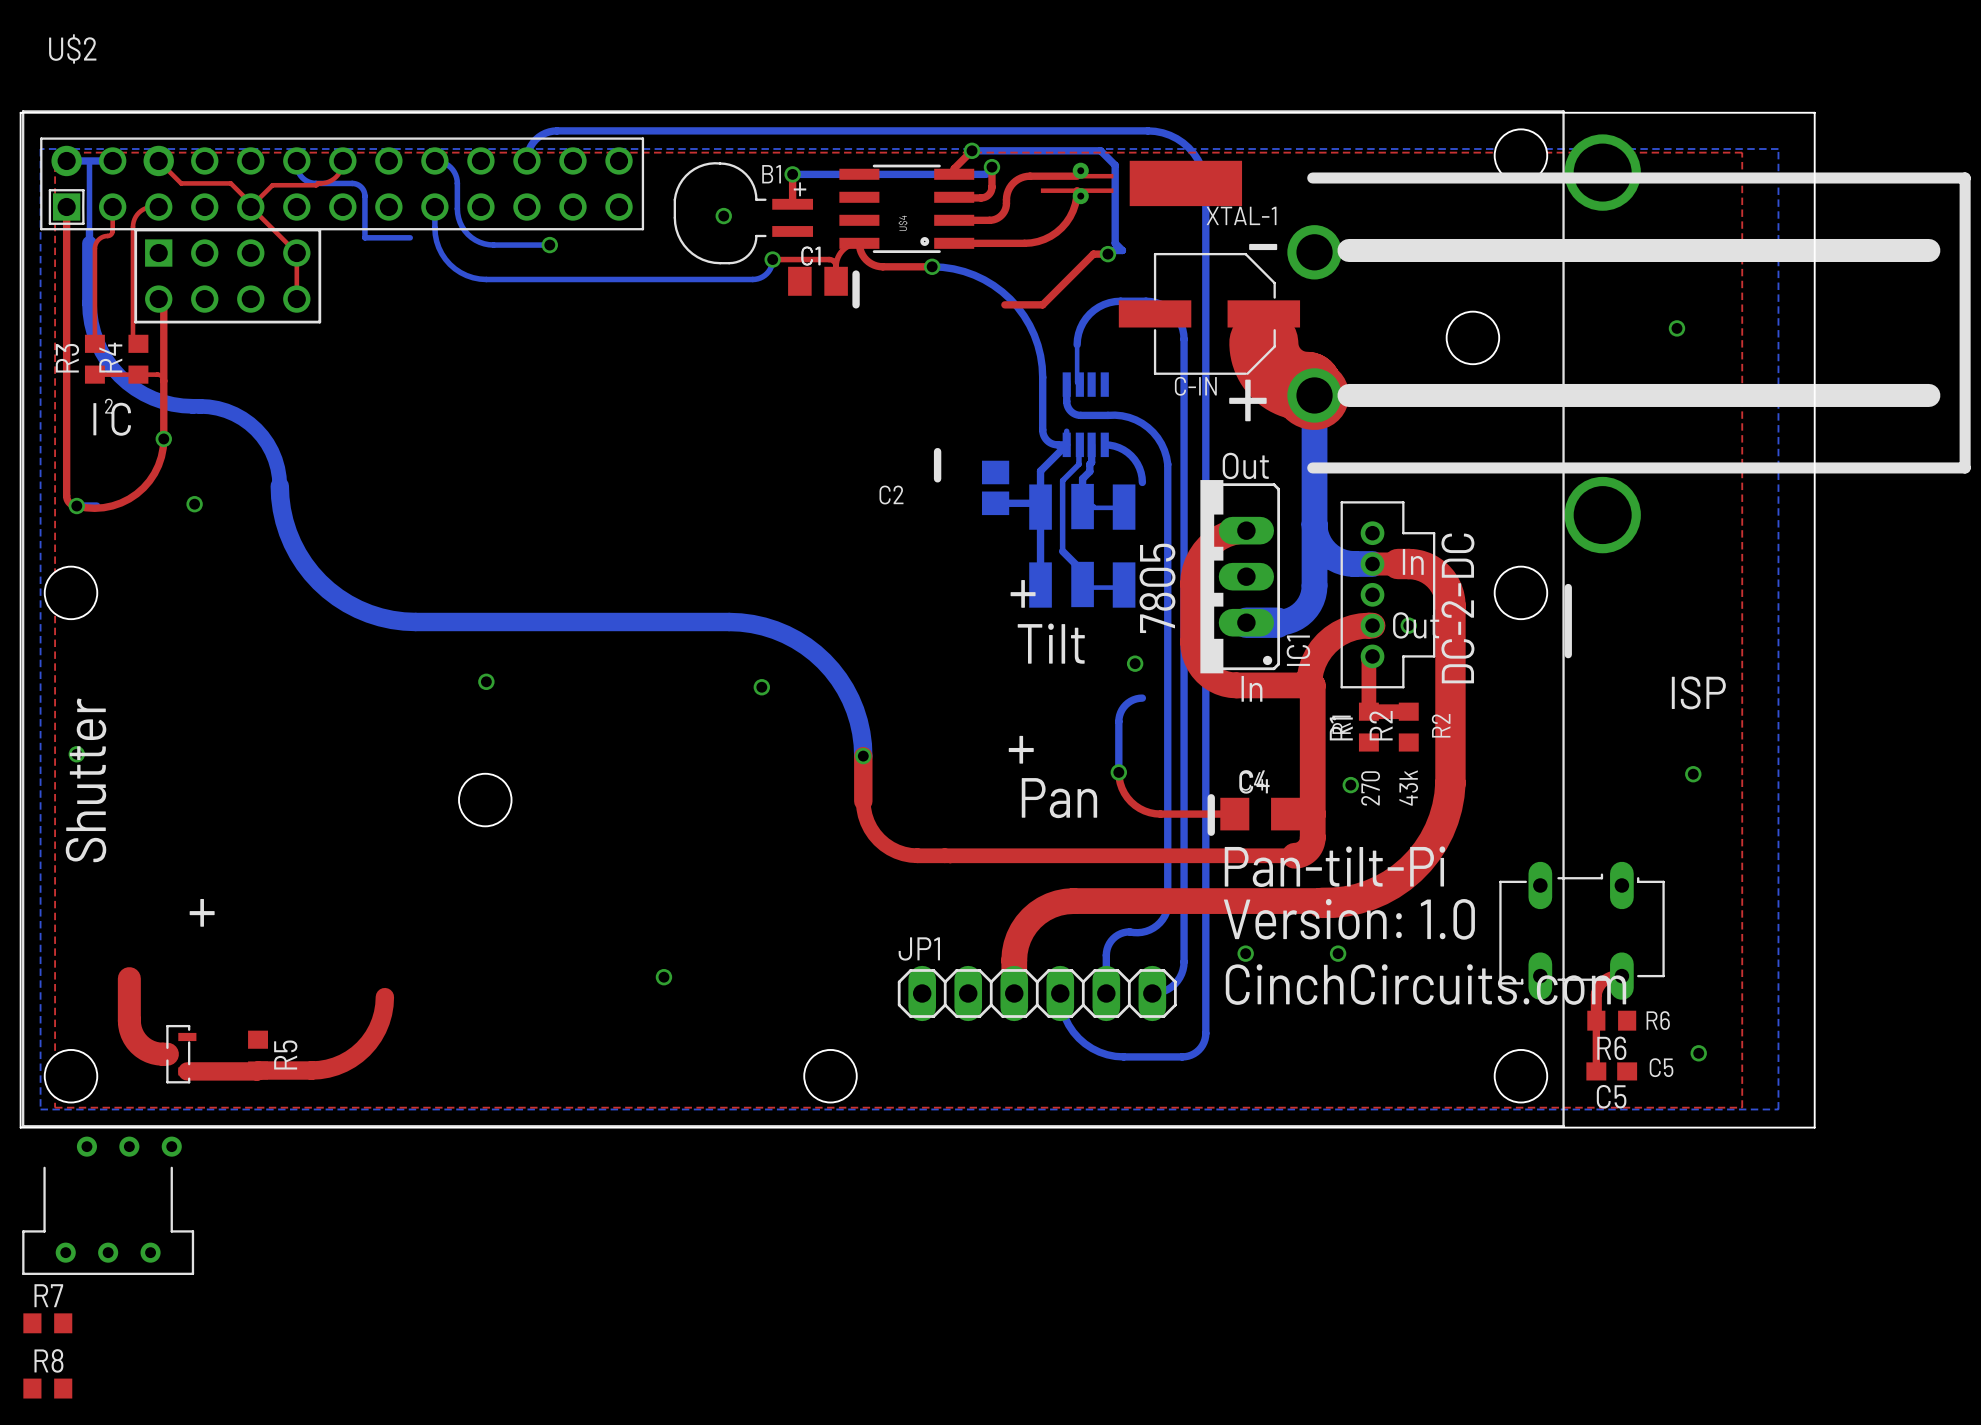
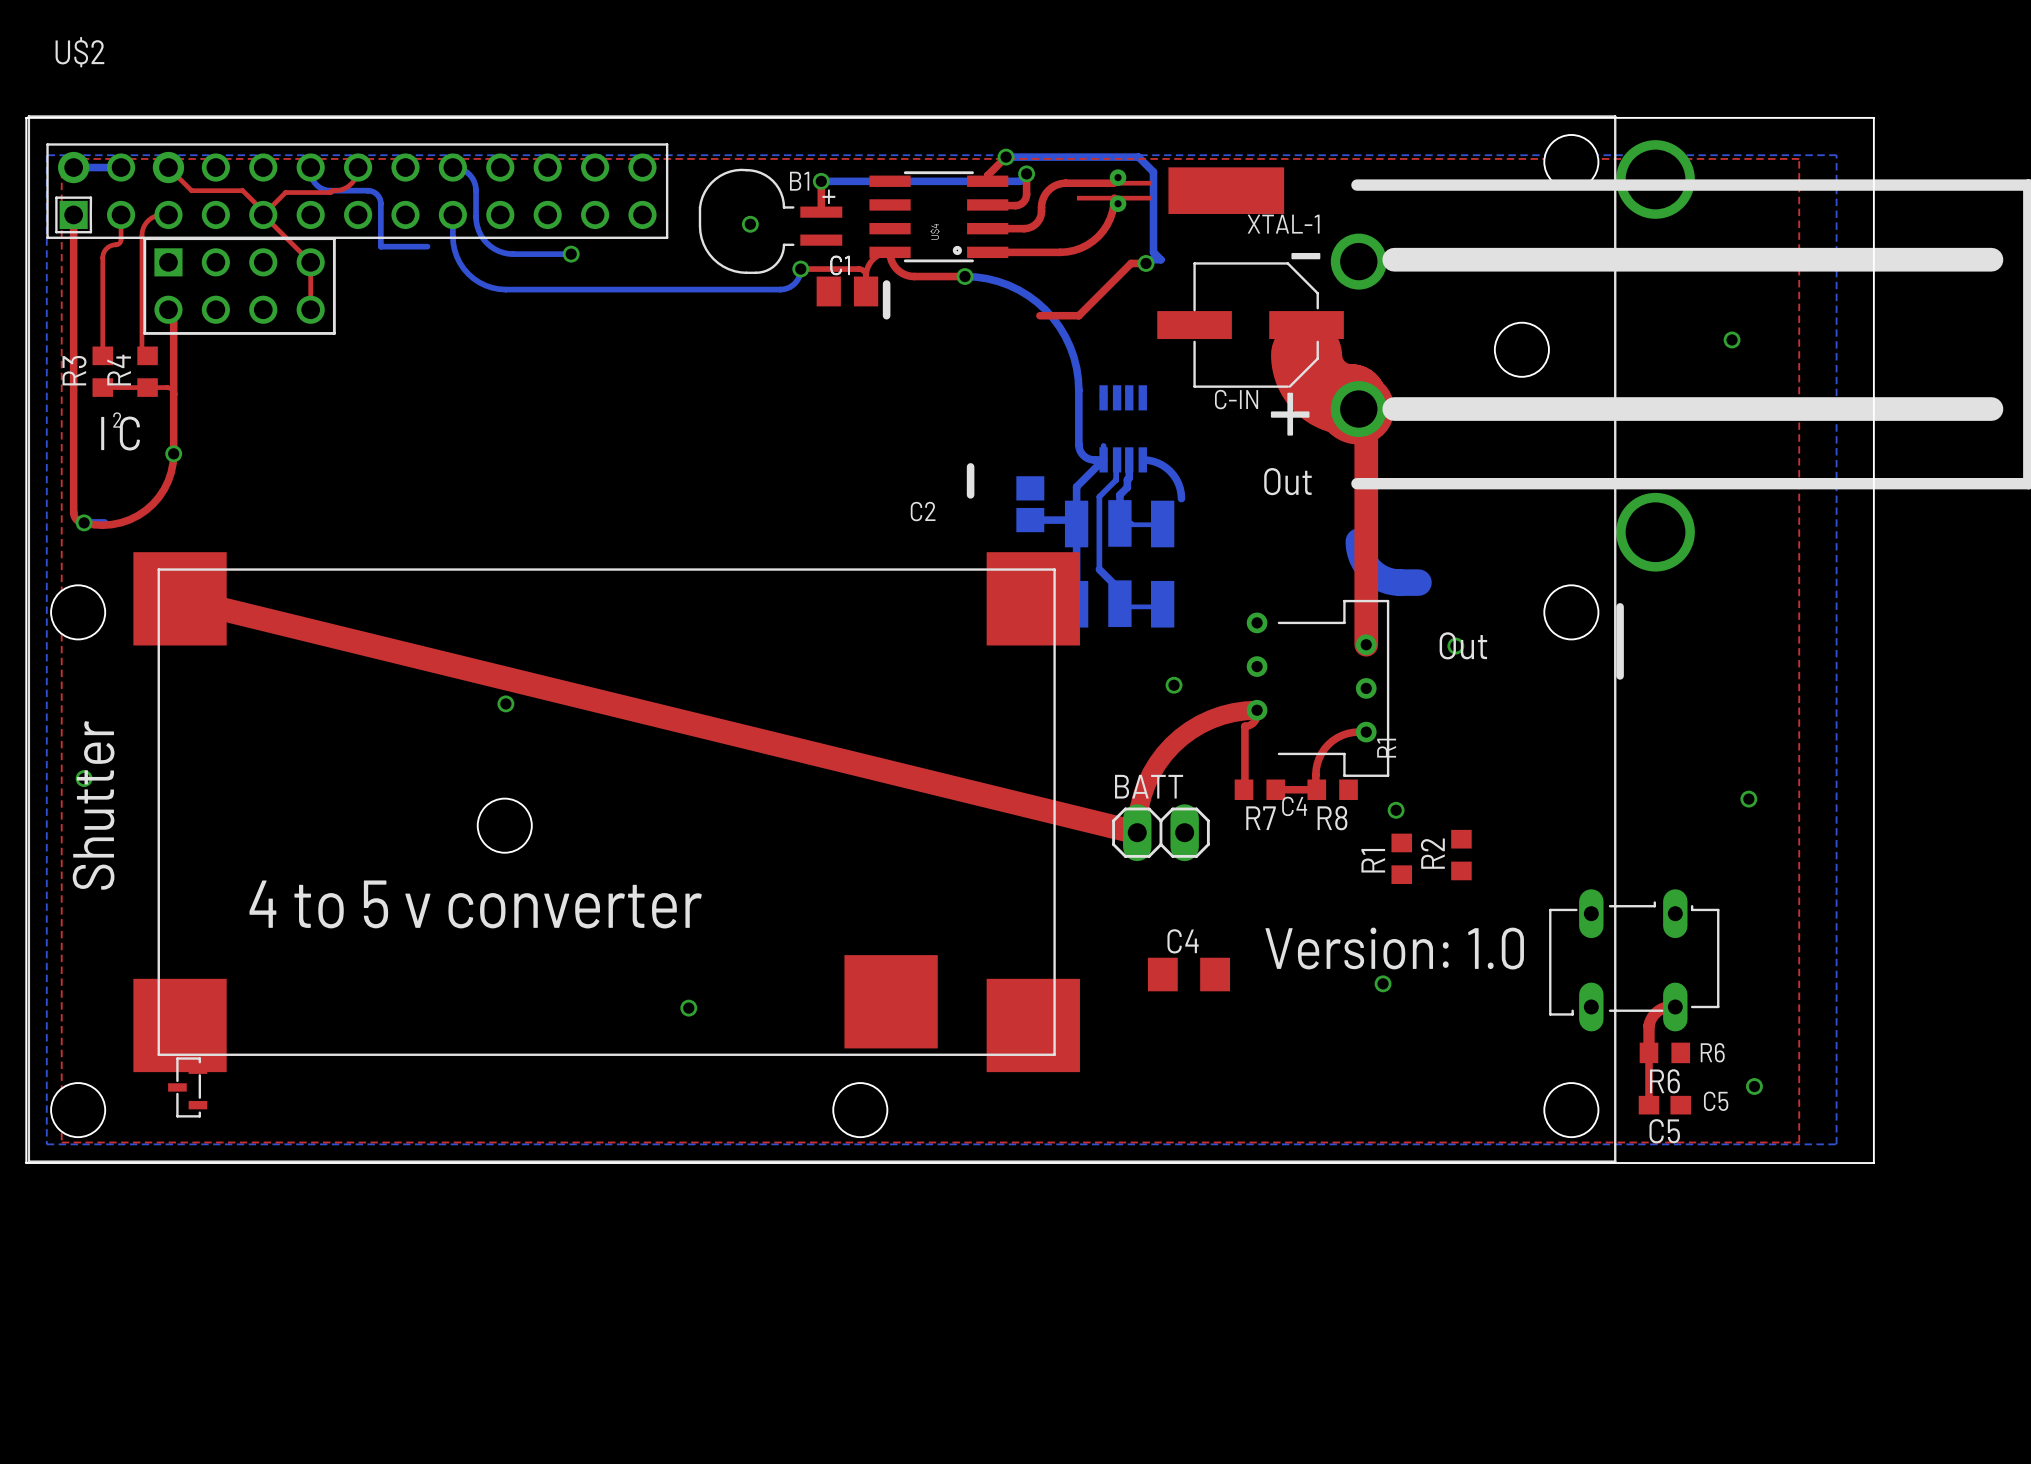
bottom track: (112, 160) (89, 160) (89, 313) (93, 333) (101, 351) (119, 376) (144, 394) (172, 404) (208, 406) (226, 410) (242, 418) (256, 429) (267, 443) (275, 459) (279, 477) (281, 509) (292, 543) (304, 564) (328, 590) (358, 609) (380, 617) (403, 621) (729, 621) (763, 626) (785, 634) (806, 646) (831, 669) (845, 689) (855, 710) (861, 732) (863, 756) -> none
bottom track: (526, 160) (529, 149) (535, 139) (545, 133) (557, 130) (1147, 130) (1162, 132) (1176, 138) (1188, 147) (1198, 159) (1203, 173) (1205, 188) (1205, 1039) (1198, 1050) (1185, 1056) (1123, 1056) (1107, 1054) (1085, 1043) (1073, 1032) (1065, 1017) (1060, 993) -> none
bottom track: (1066, 384) (1066, 403) (1072, 412) (1078, 415) (1122, 415) (1142, 423) (1153, 432) (1161, 443) (1167, 464) (1167, 908) (1162, 919) (1153, 927) (1142, 932) (1123, 932) (1111, 941) (1106, 952) (1106, 993) -> none
bottom track: (1079, 384) (1077, 381) (1077, 339) (1082, 322) (1094, 310) (1114, 301) (1150, 301) (1165, 306) (1176, 316) (1182, 329) (1184, 339) (1184, 961) (1181, 973) (1174, 984) (1164, 991) (1152, 993) -> none
top track: none -> (1358, 409) (1364, 411) (1366, 416) (1366, 644)
via: (194, 504) -> none
bottom track: (1314, 506) (1314, 395) (1313, 595) (1303, 611) (1291, 619) (1277, 622) (1246, 622) -> none
top track: (1246, 530) (1232, 532) (1213, 541) (1204, 551) (1197, 563) (1193, 583) (1193, 647) (1196, 658) (1205, 672) (1225, 683) (1312, 685) (1312, 837) (1310, 846) (1303, 853) (1294, 855) (917, 855) (903, 853) (890, 848) (879, 839) (867, 822) (863, 801) (863, 756) -> none
text: In (1413, 561) -> none
top track: (1372, 564) (1408, 564) (1424, 567) (1441, 580) (1450, 600) (1449, 795) (1439, 830) (1419, 861) (1401, 877) (1380, 890) (1346, 901) (1321, 902) (1319, 901) (1073, 901) (1058, 903) (1037, 913) (1026, 924) (1018, 937) (1014, 952) (1014, 993) -> none
IC1: (1240, 576) -> none
top track: none -> (180, 598) (1137, 832) (1139, 806) (1146, 784) (1157, 763) (1172, 745) (1190, 730) (1211, 719) (1233, 712) (1257, 710) (1254, 721) (1244, 726) (1244, 789)
text: 7805 (1157, 588) -> none
text: + (1023, 593) -> none
part: (1387, 594) -> none
text: DC-2-DC (1457, 608) -> none
top track: (1372, 625) (1346, 630) (1326, 643) (1313, 662) (1309, 685) -> none
text: Tilt (1051, 643) -> none
top track: (1372, 656) (1368, 659) (1368, 711) (1408, 711) -> none
part: none -> (1318, 688)
via: (761, 687) -> none
text: In (1251, 688) -> none
text: ISP (1698, 692) -> none
bottom track: (1142, 698) (1128, 702) (1119, 715) (1118, 772) -> none
top track: none -> (1366, 732) (1342, 735) (1324, 748) (1316, 769) (1316, 789) (1275, 789)
text: R2 (1441, 725) -> none
R1 position: (1368, 727) -> (1401, 858)
R2 position: (1408, 727) -> (1461, 855)
text: + (1021, 749) -> none
via: (863, 756) -> none
top track: (1118, 772) (1120, 783) (1127, 797) (1144, 810) (1160, 814) (1234, 814) -> none
via: (1118, 772) -> none
part: none -> (606, 812)
text: 270 (1370, 788) -> none
text: 43k (1408, 788) -> none
line: (1211, 797) (1211, 832) -> none
text: Pan (1059, 798) -> none
BATT: none -> (1160, 832)
C4 position: (1260, 814) -> (1188, 974)
text: Pan-tilt-Pi (1334, 866) -> none
text: none -> 4 to 5 v converter (475, 904)
text: + (202, 912) -> none
via: (1245, 953) -> none
top track: (129, 978) (129, 1025) (133, 1037) (146, 1049) (154, 1053) (167, 1054) -> none
text: CinchCircuits.com (1425, 984) -> none
JP1: (1037, 993) -> none
top track: (384, 997) (380, 1021) (368, 1042) (357, 1054) (335, 1066) (311, 1070) (187, 1071) -> none
R5: (258, 1055) -> none
part: (108, 1205) -> none
R7 name position: R7 (48, 1295) -> R7 (1261, 818)
R7 position: (47, 1323) -> (1259, 789)
R8 name position: R8 (48, 1360) -> R8 (1332, 818)
R8 position: (47, 1388) -> (1332, 789)

